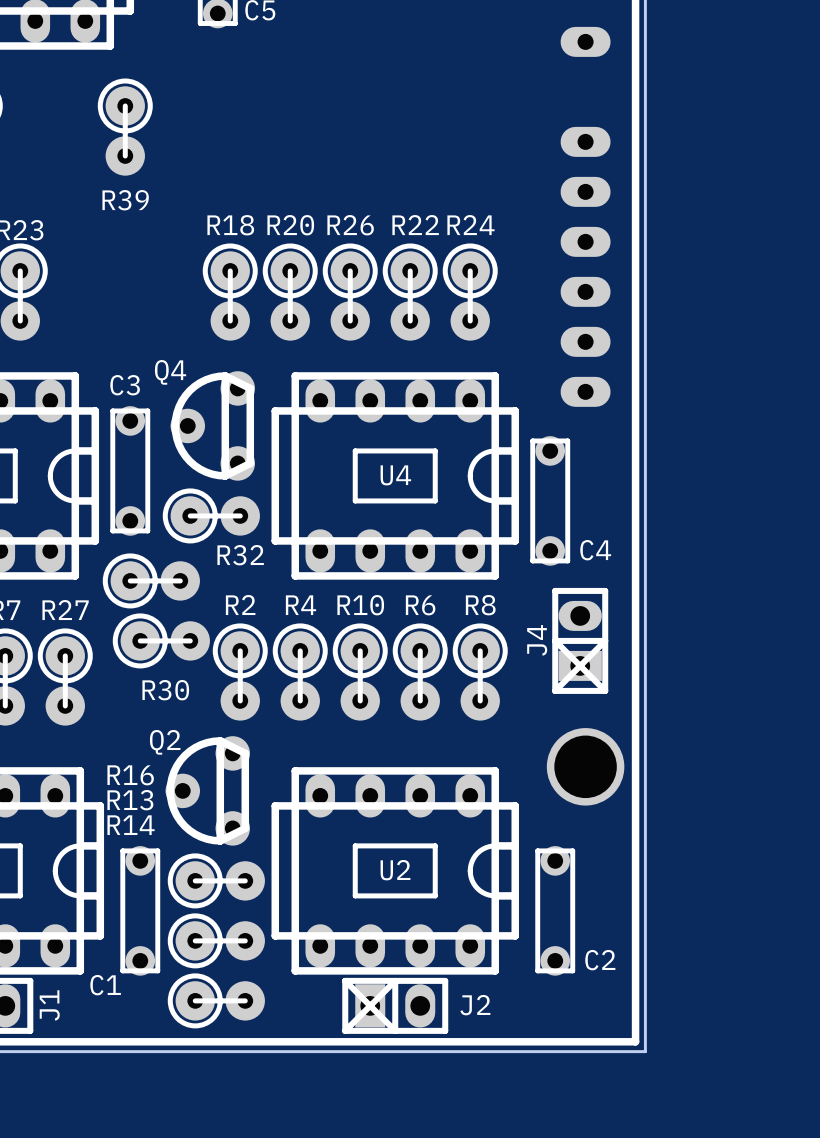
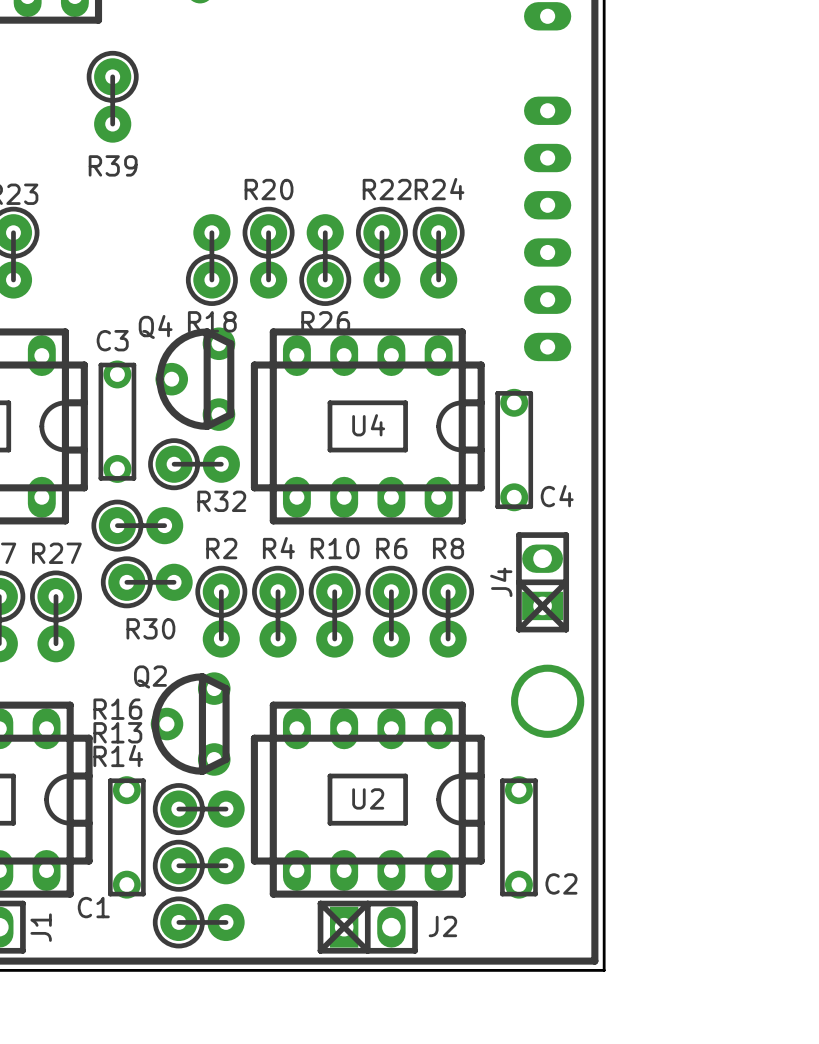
R18 rotation: 0° (230, 292) -> 180° (211, 260)
R26 rotation: 0° (350, 292) -> 180° (325, 260)

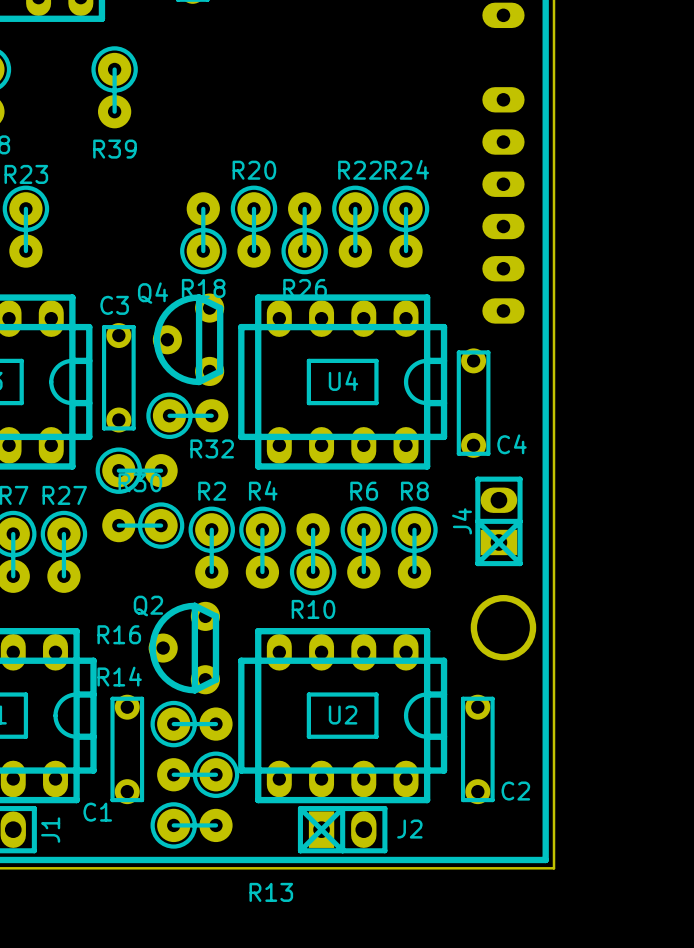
R30 rotation: 0° (146, 582) -> 180° (143, 525)
R10 rotation: 0° (334, 611) -> 180° (313, 554)
R13 rotation: 0° (198, 865) -> 180° (198, 774)

